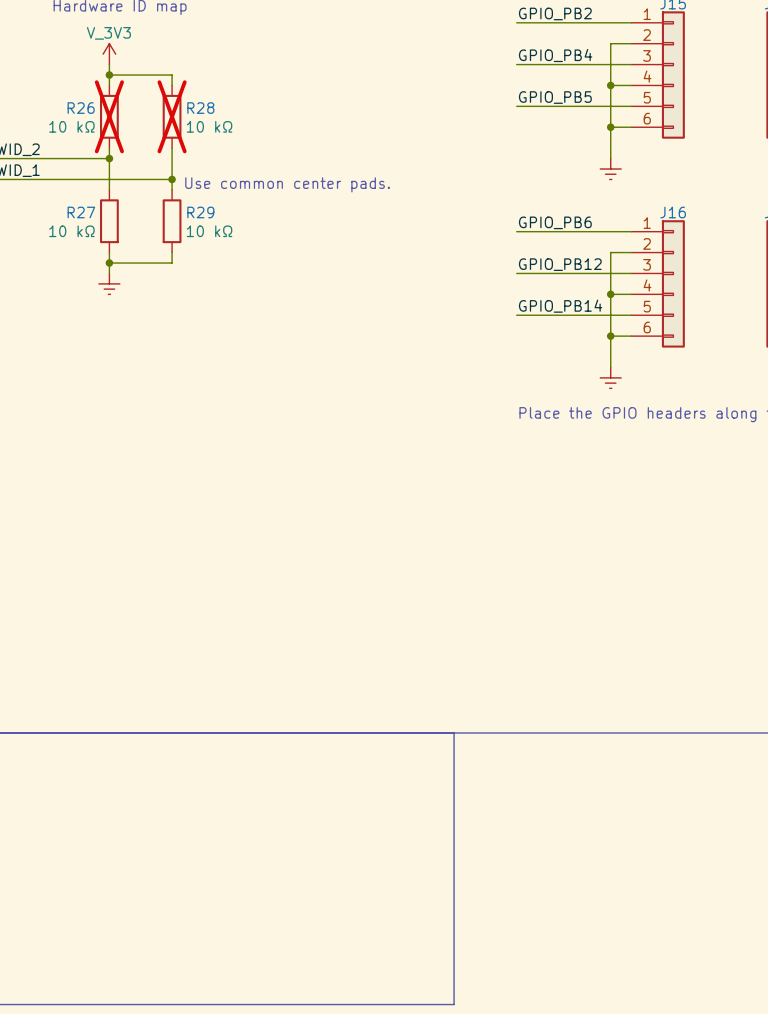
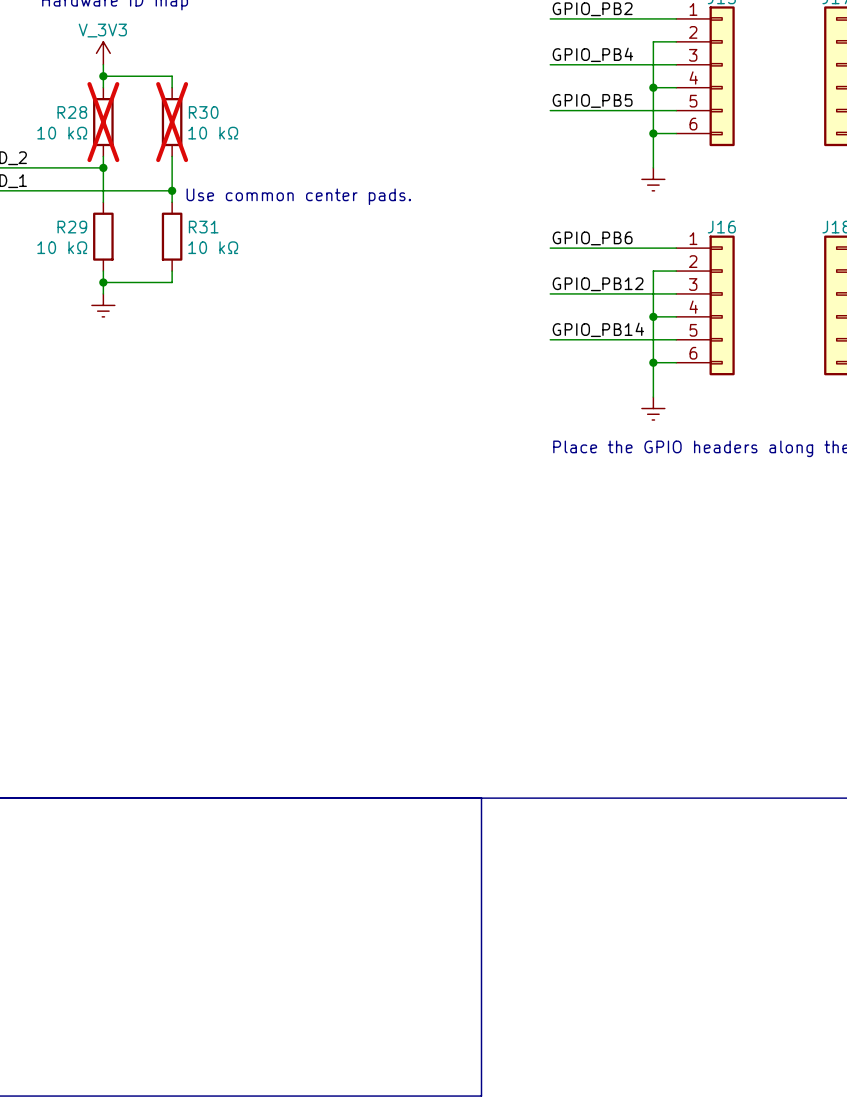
R26 name: R26 (81, 108) -> R28 (72, 112)
R28 name: R28 (200, 108) -> R30 (203, 112)
R27 name: R27 (81, 212) -> R29 (72, 227)
R29 name: R29 (200, 212) -> R31 (203, 227)

